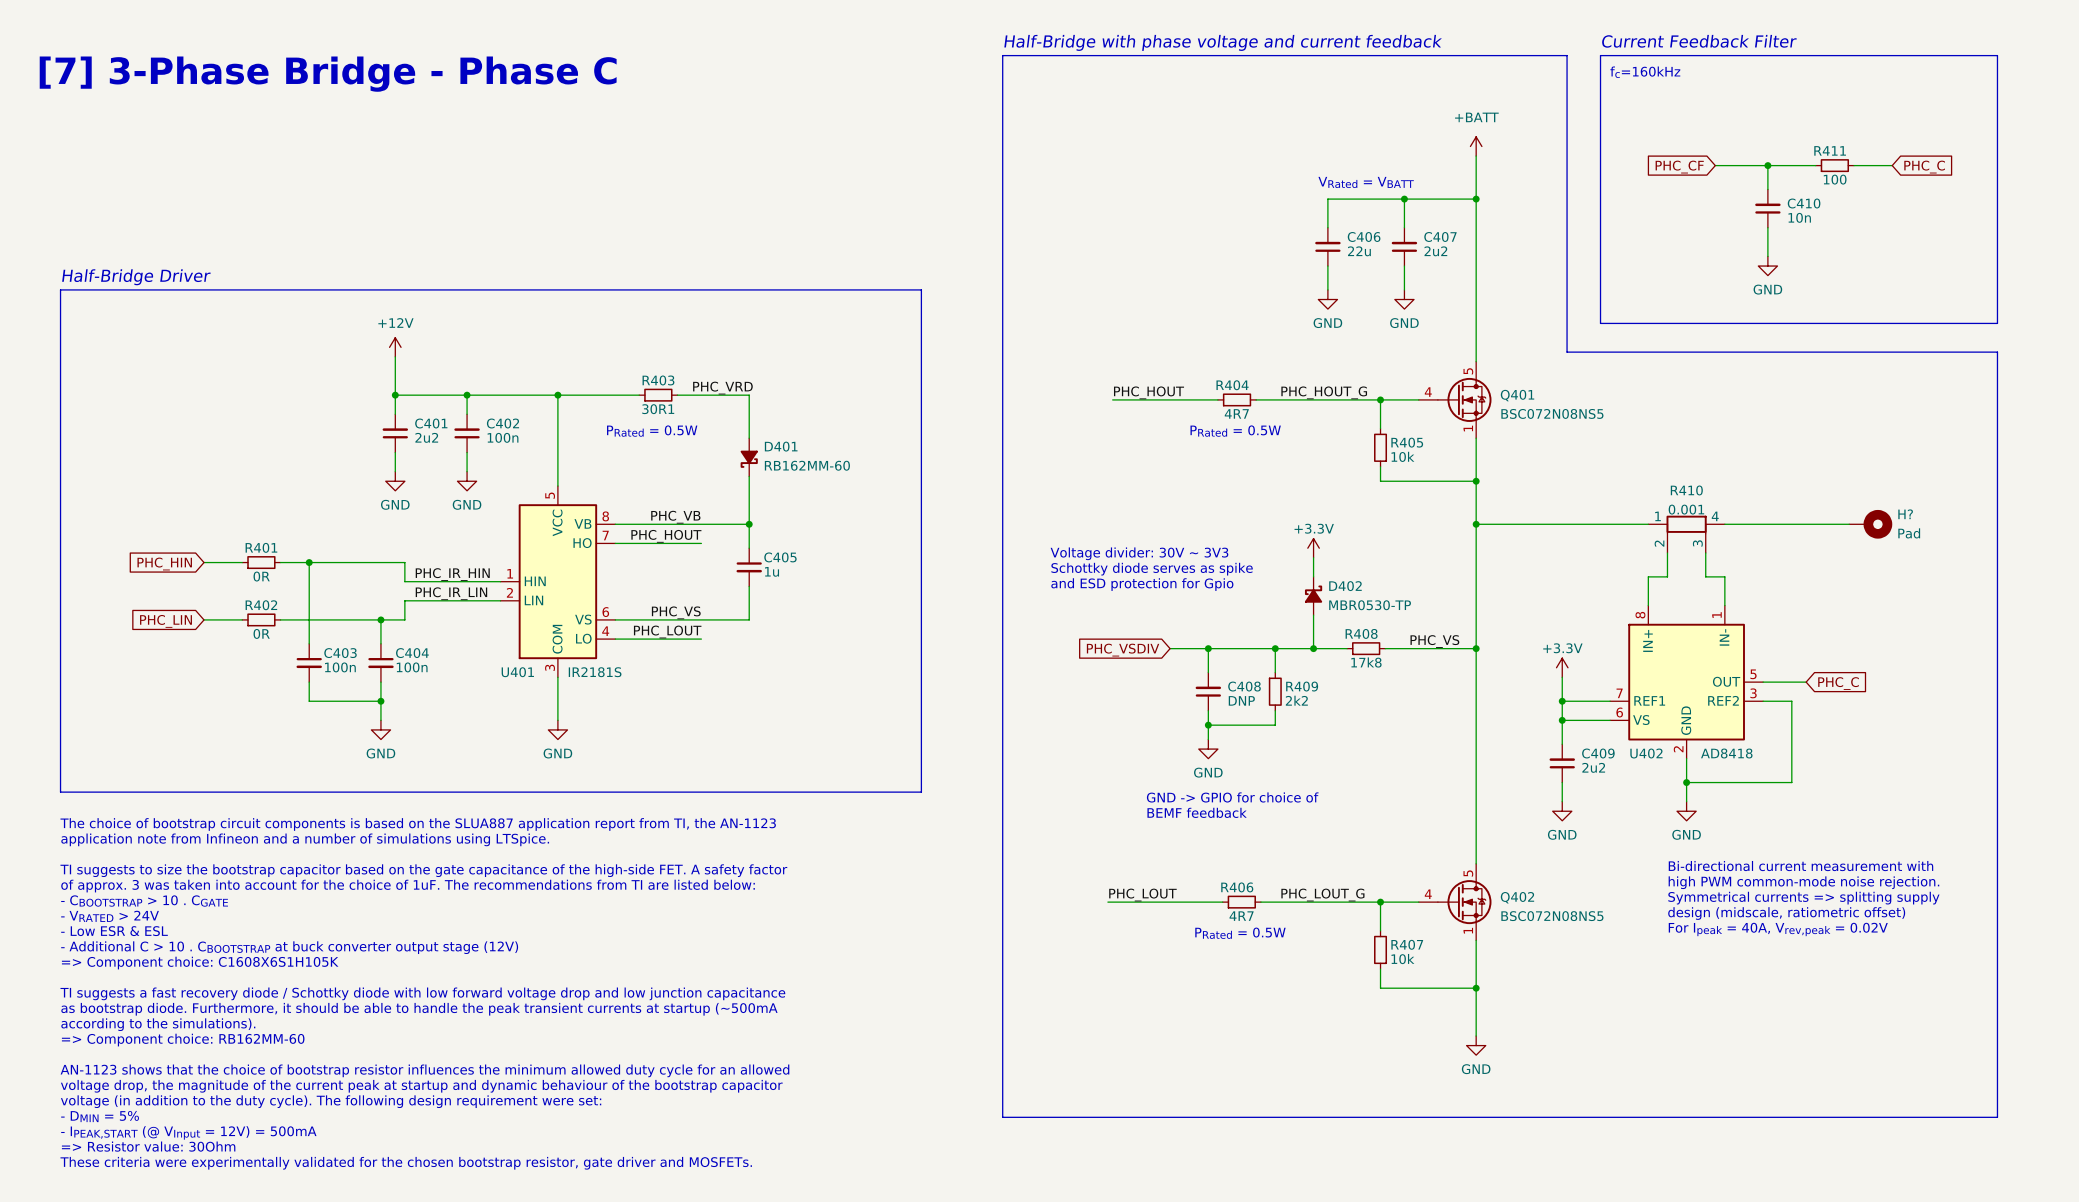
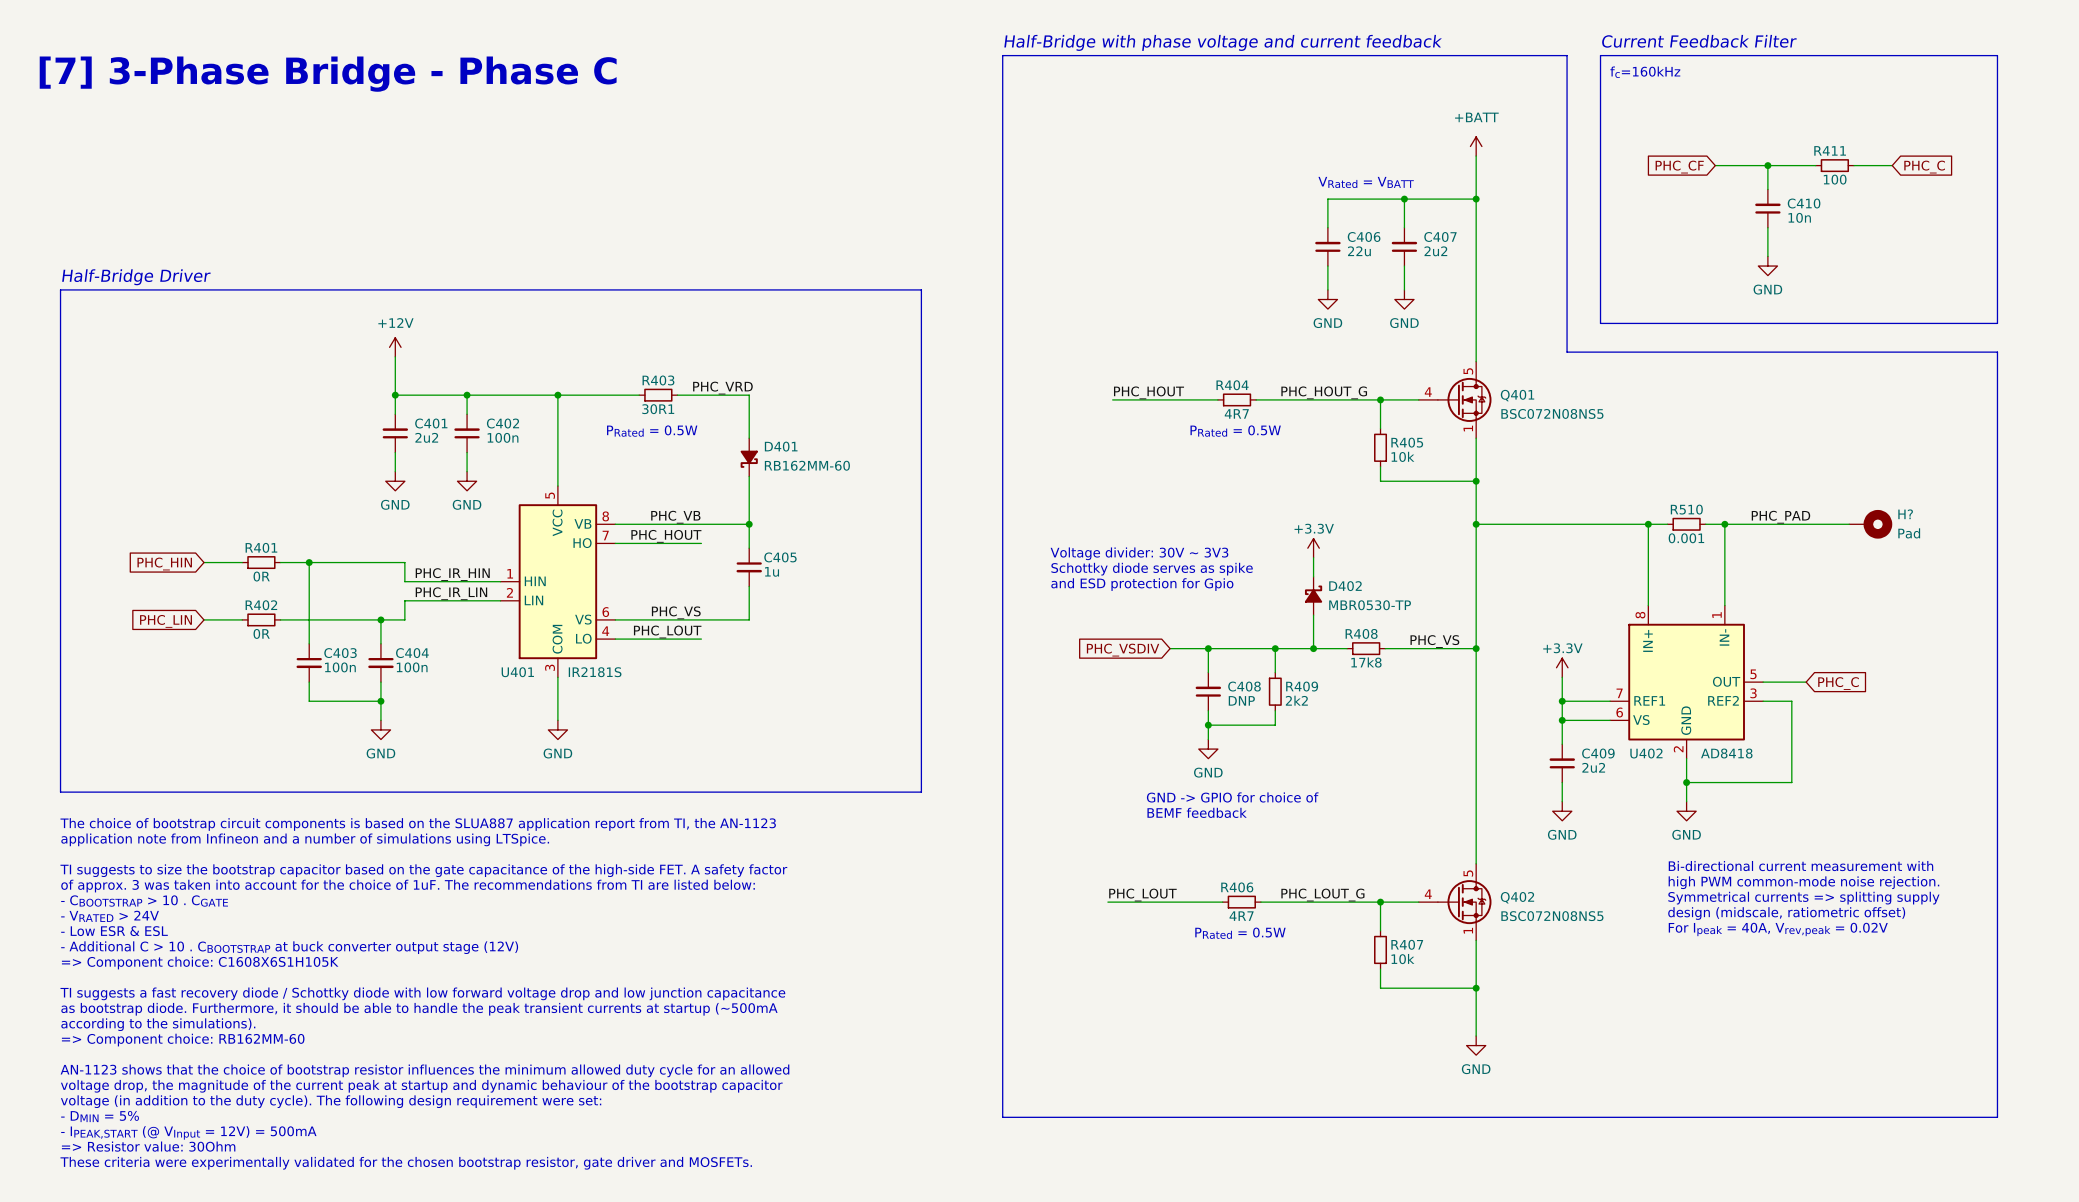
label: none -> PHC_PAD (1780, 517)
junction: none -> (1648, 524)
R510: none -> 0.001 (1686, 524)
junction: none -> (1724, 524)
R410: 0.001 (1686, 534) -> none
wire: (1667, 552) (1667, 576) (1648, 576) -> (1667, 524) (1648, 524) (1648, 576)
wire: (1705, 552) (1705, 576) (1724, 576) -> (1705, 524) (1724, 524) (1724, 576)

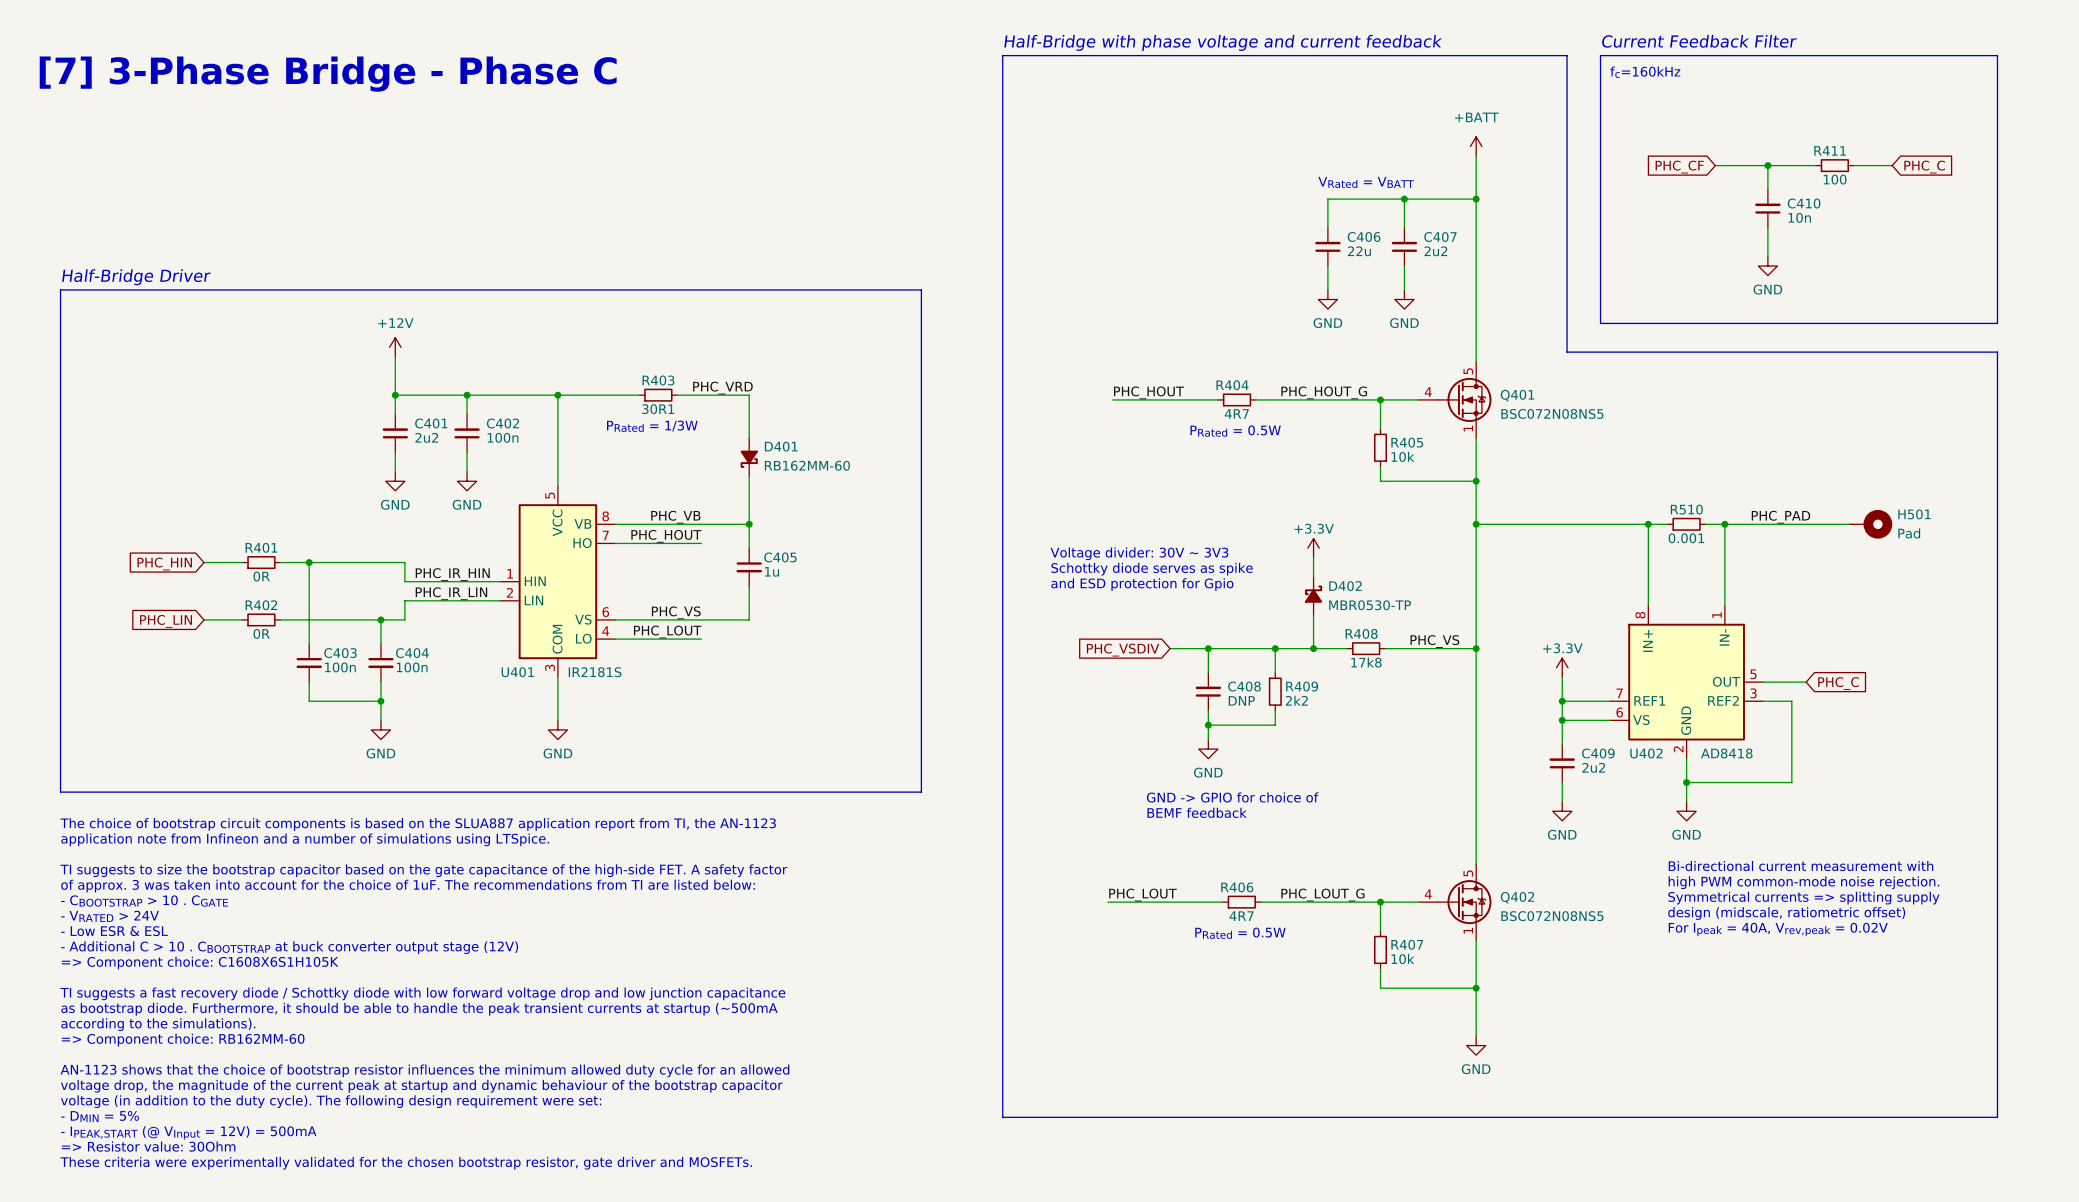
text: PRated = 0.5W (652, 431) -> PRated = 1/3W (652, 426)
H? name: H? (1905, 514) -> H501 (1914, 514)

